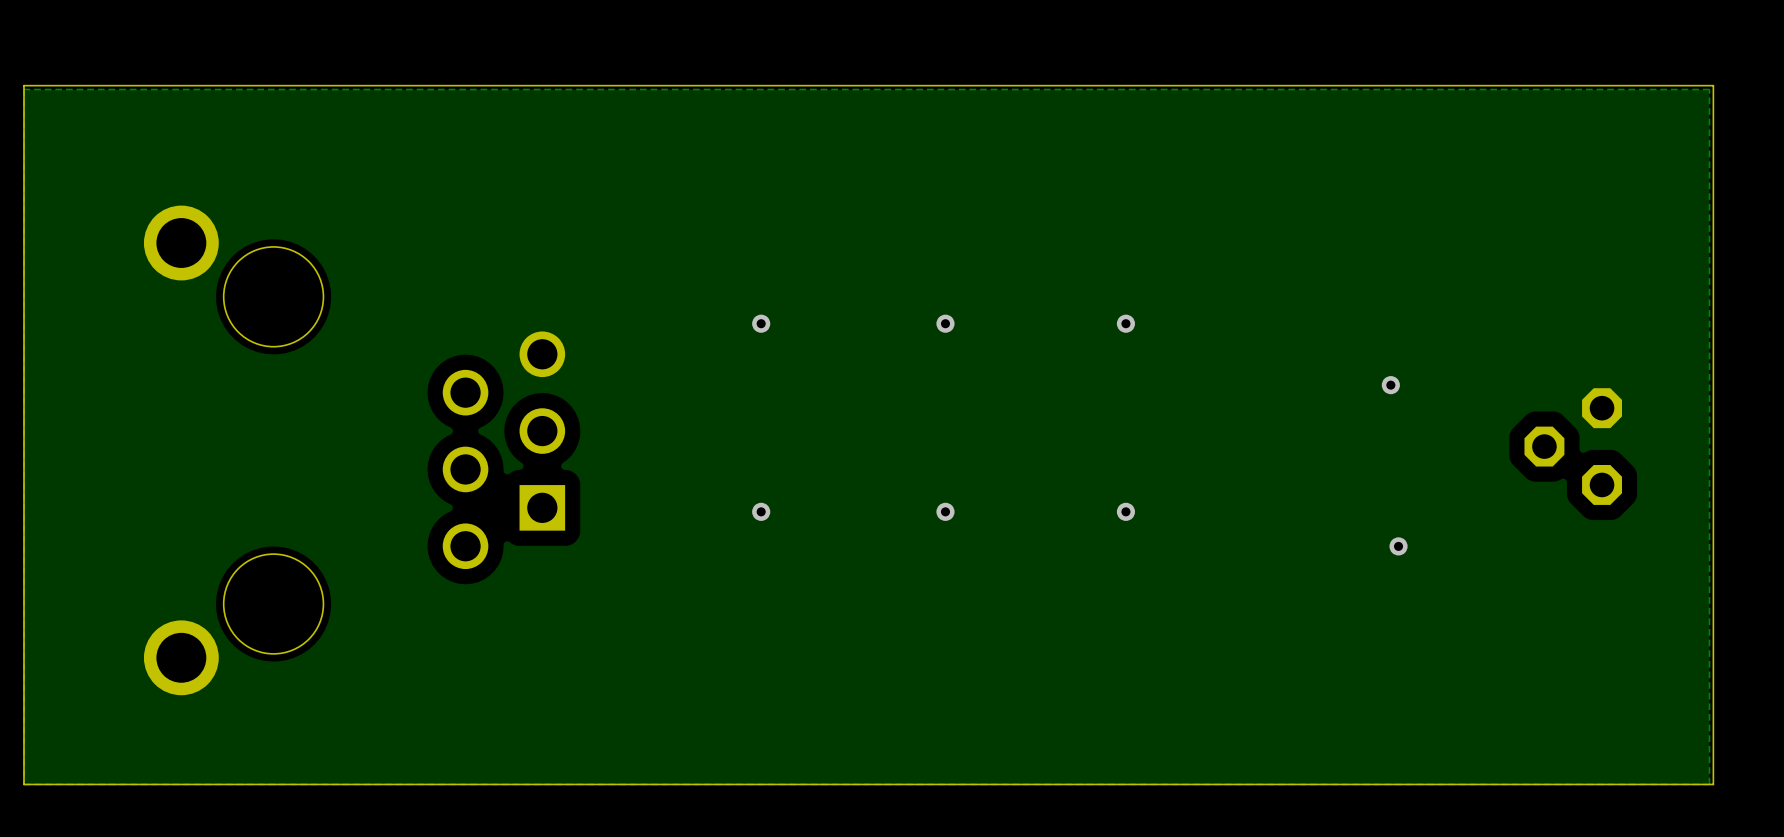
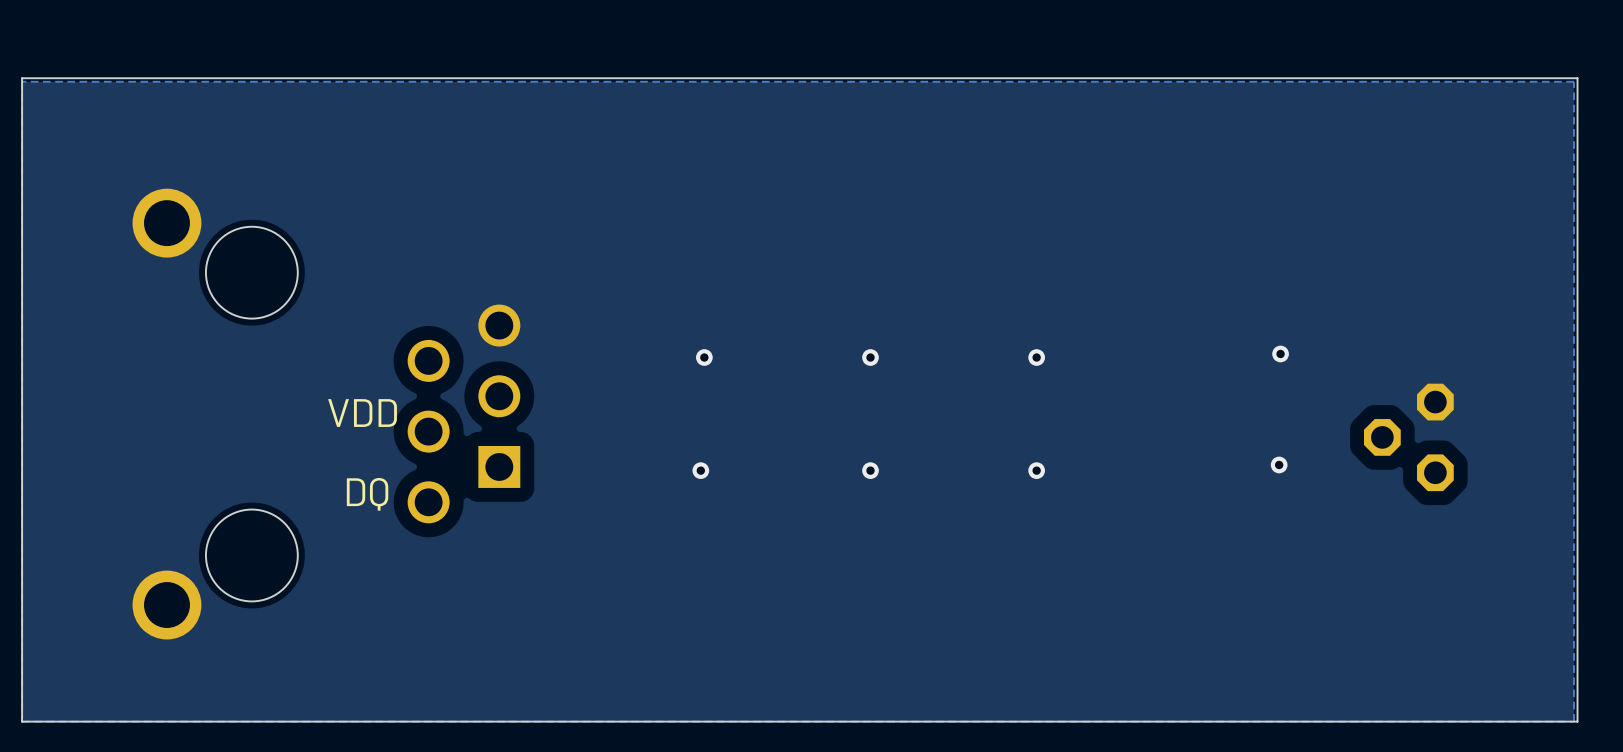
via position: (761, 323) -> (704, 357)
via position: (945, 323) -> (870, 357)
via position: (1125, 323) -> (1036, 357)
part position: (1573, 446) -> (1408, 437)
text: none -> VDD (362, 413)
text: none -> DQ (367, 494)
via position: (1398, 546) -> (1279, 464)

